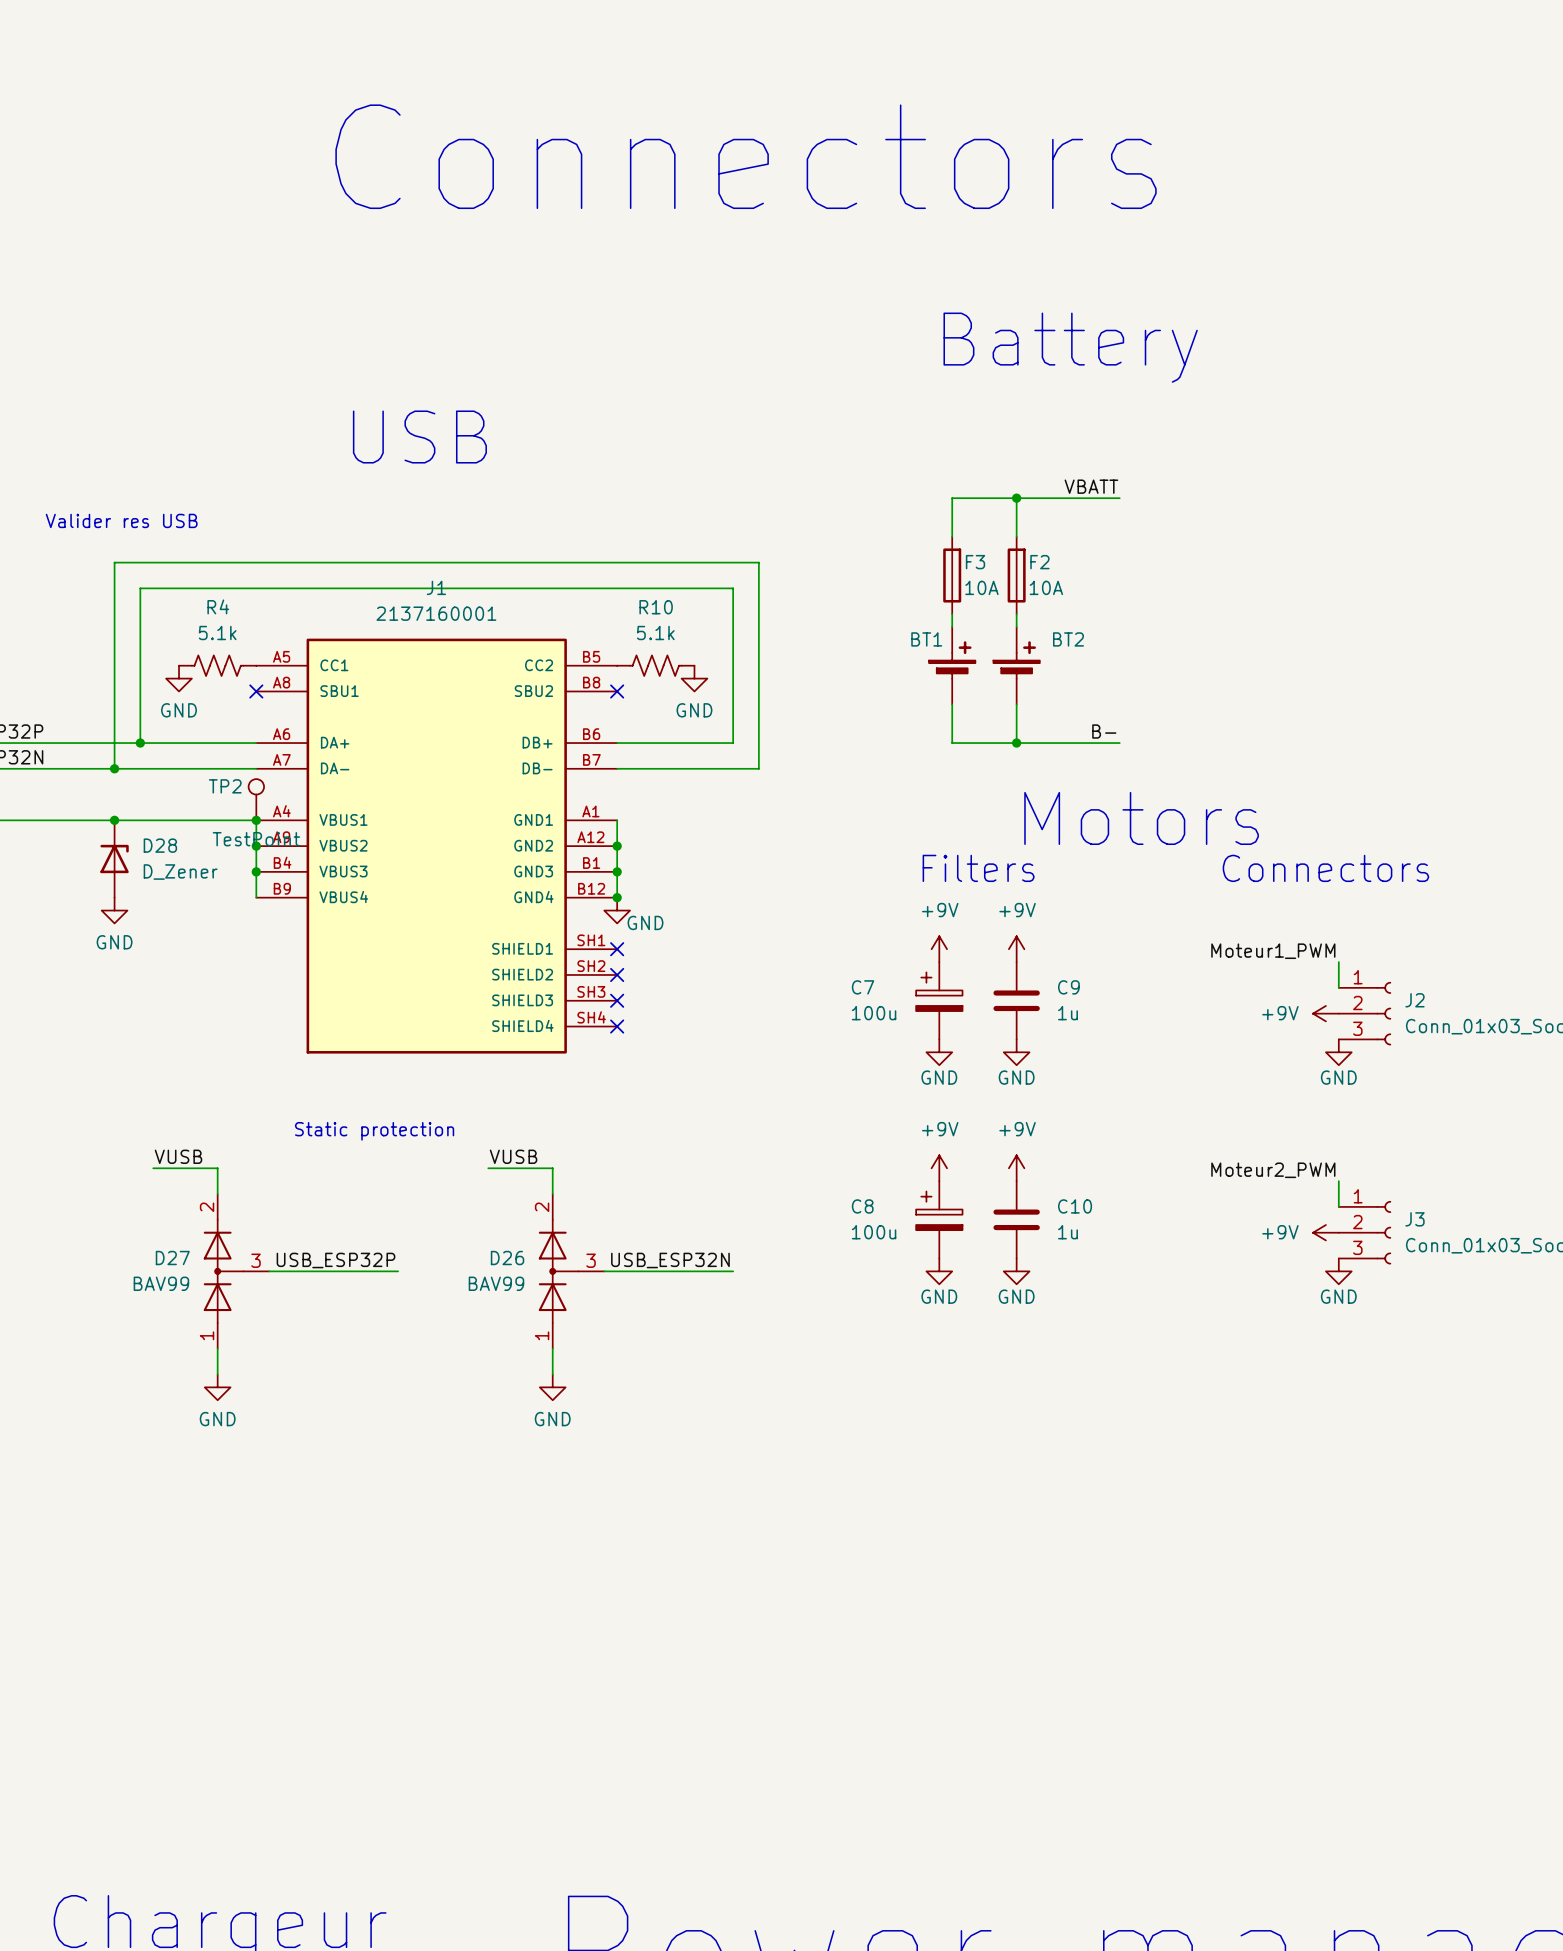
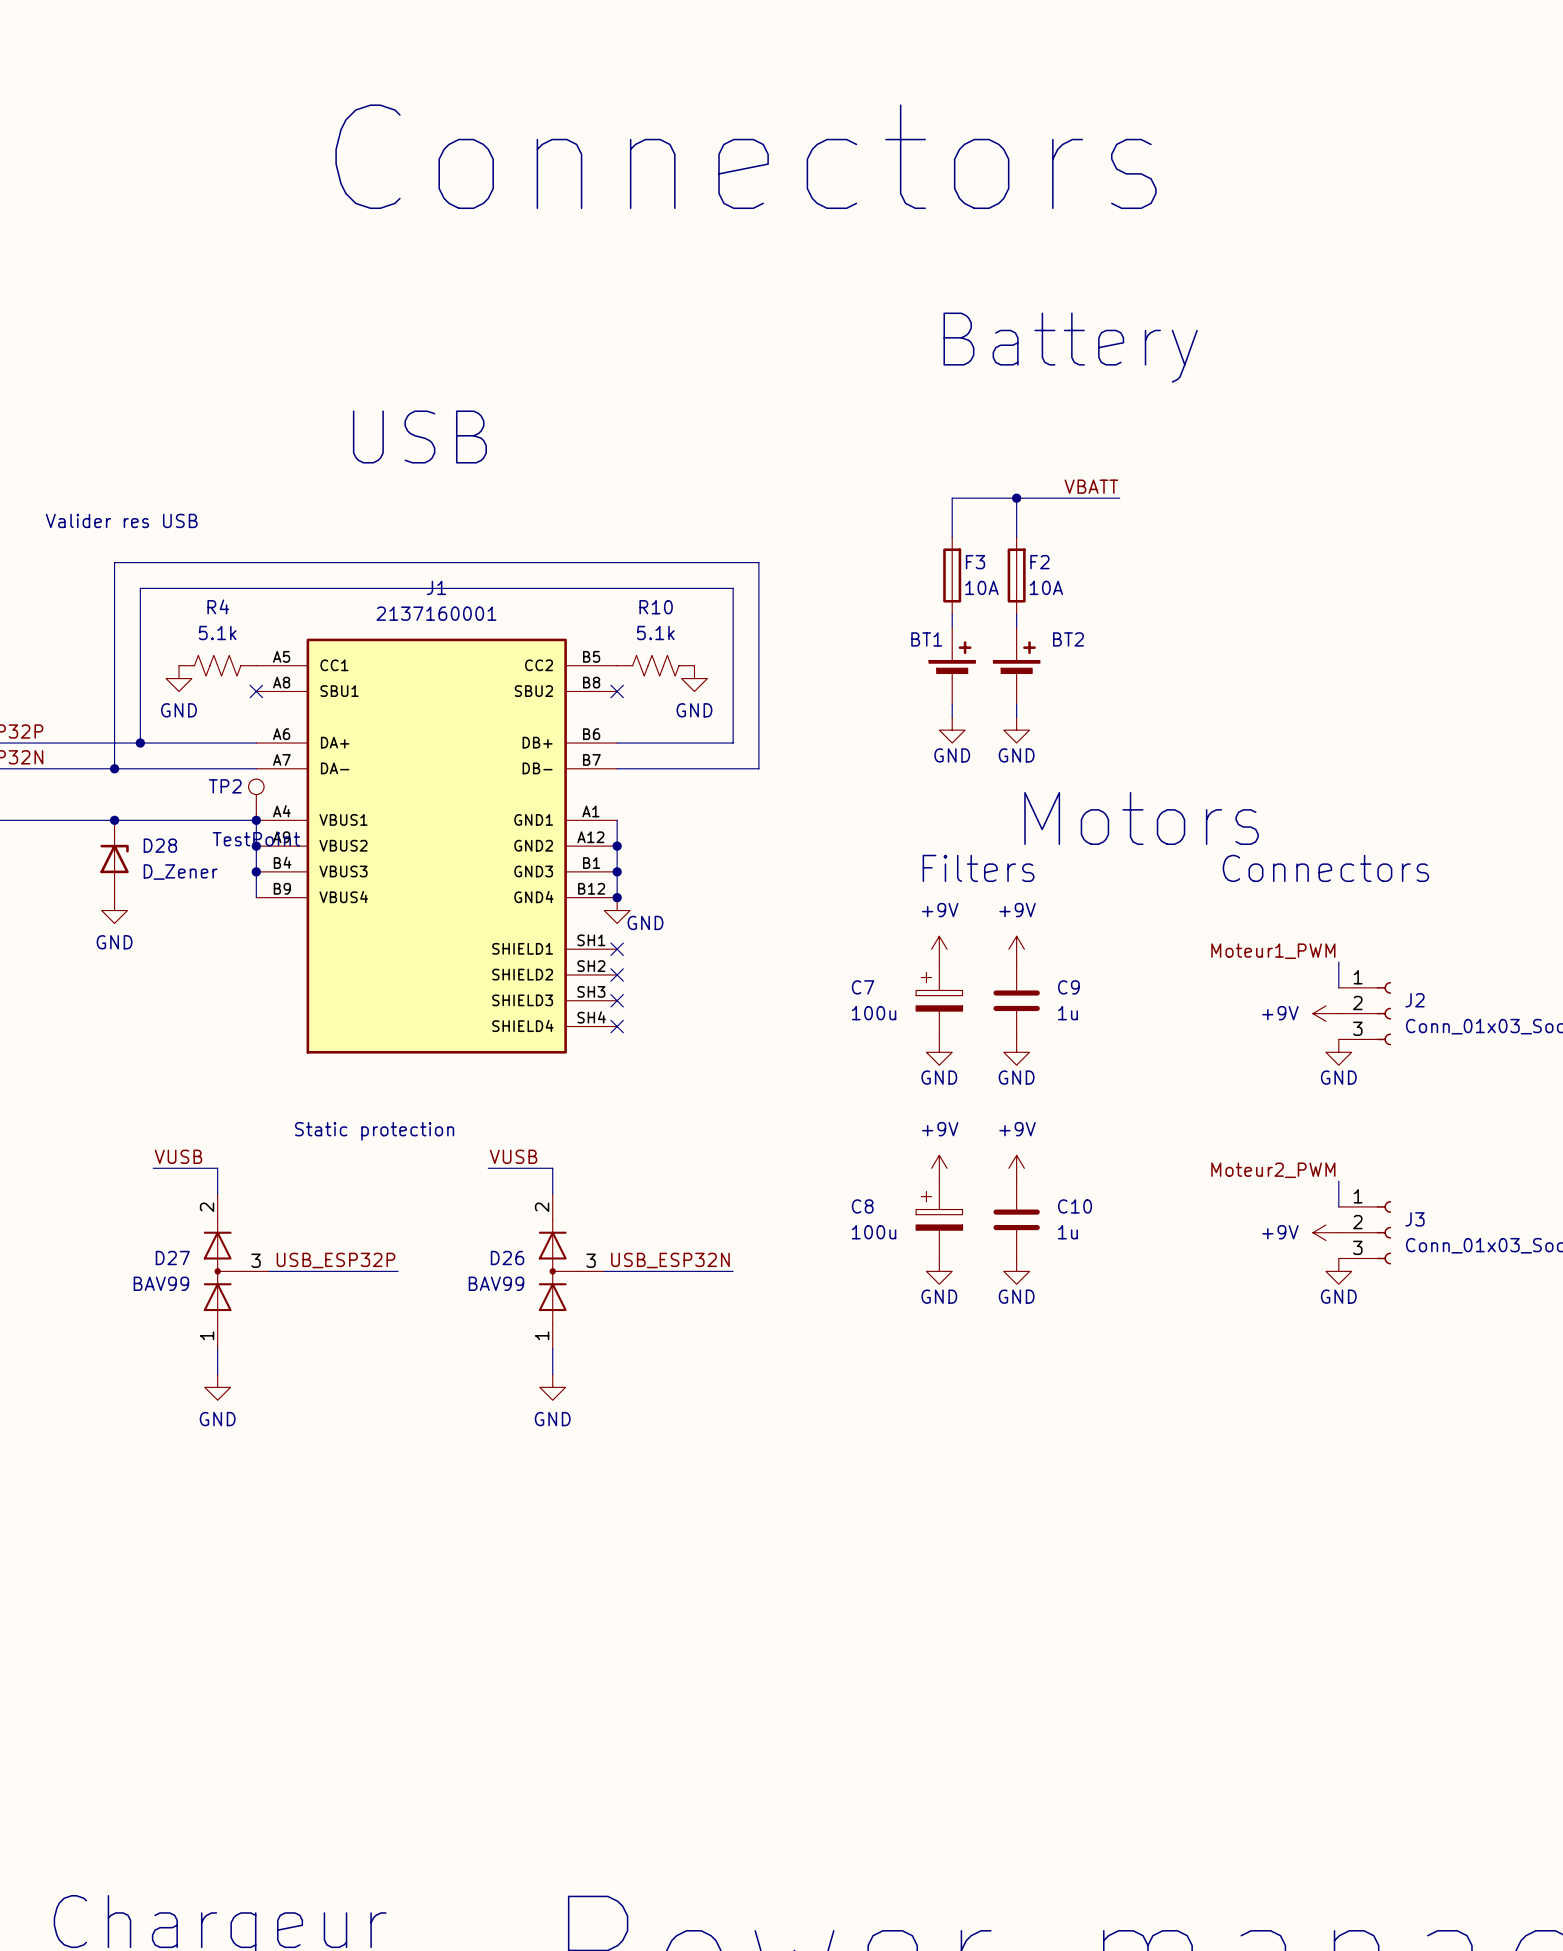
wire: (952, 717) (952, 743) (1119, 743) -> none
power symbol: none -> GND (952, 730)
power symbol: none -> GND (1016, 730)
label: B- (1104, 731) -> none
junction: (1016, 743) -> none

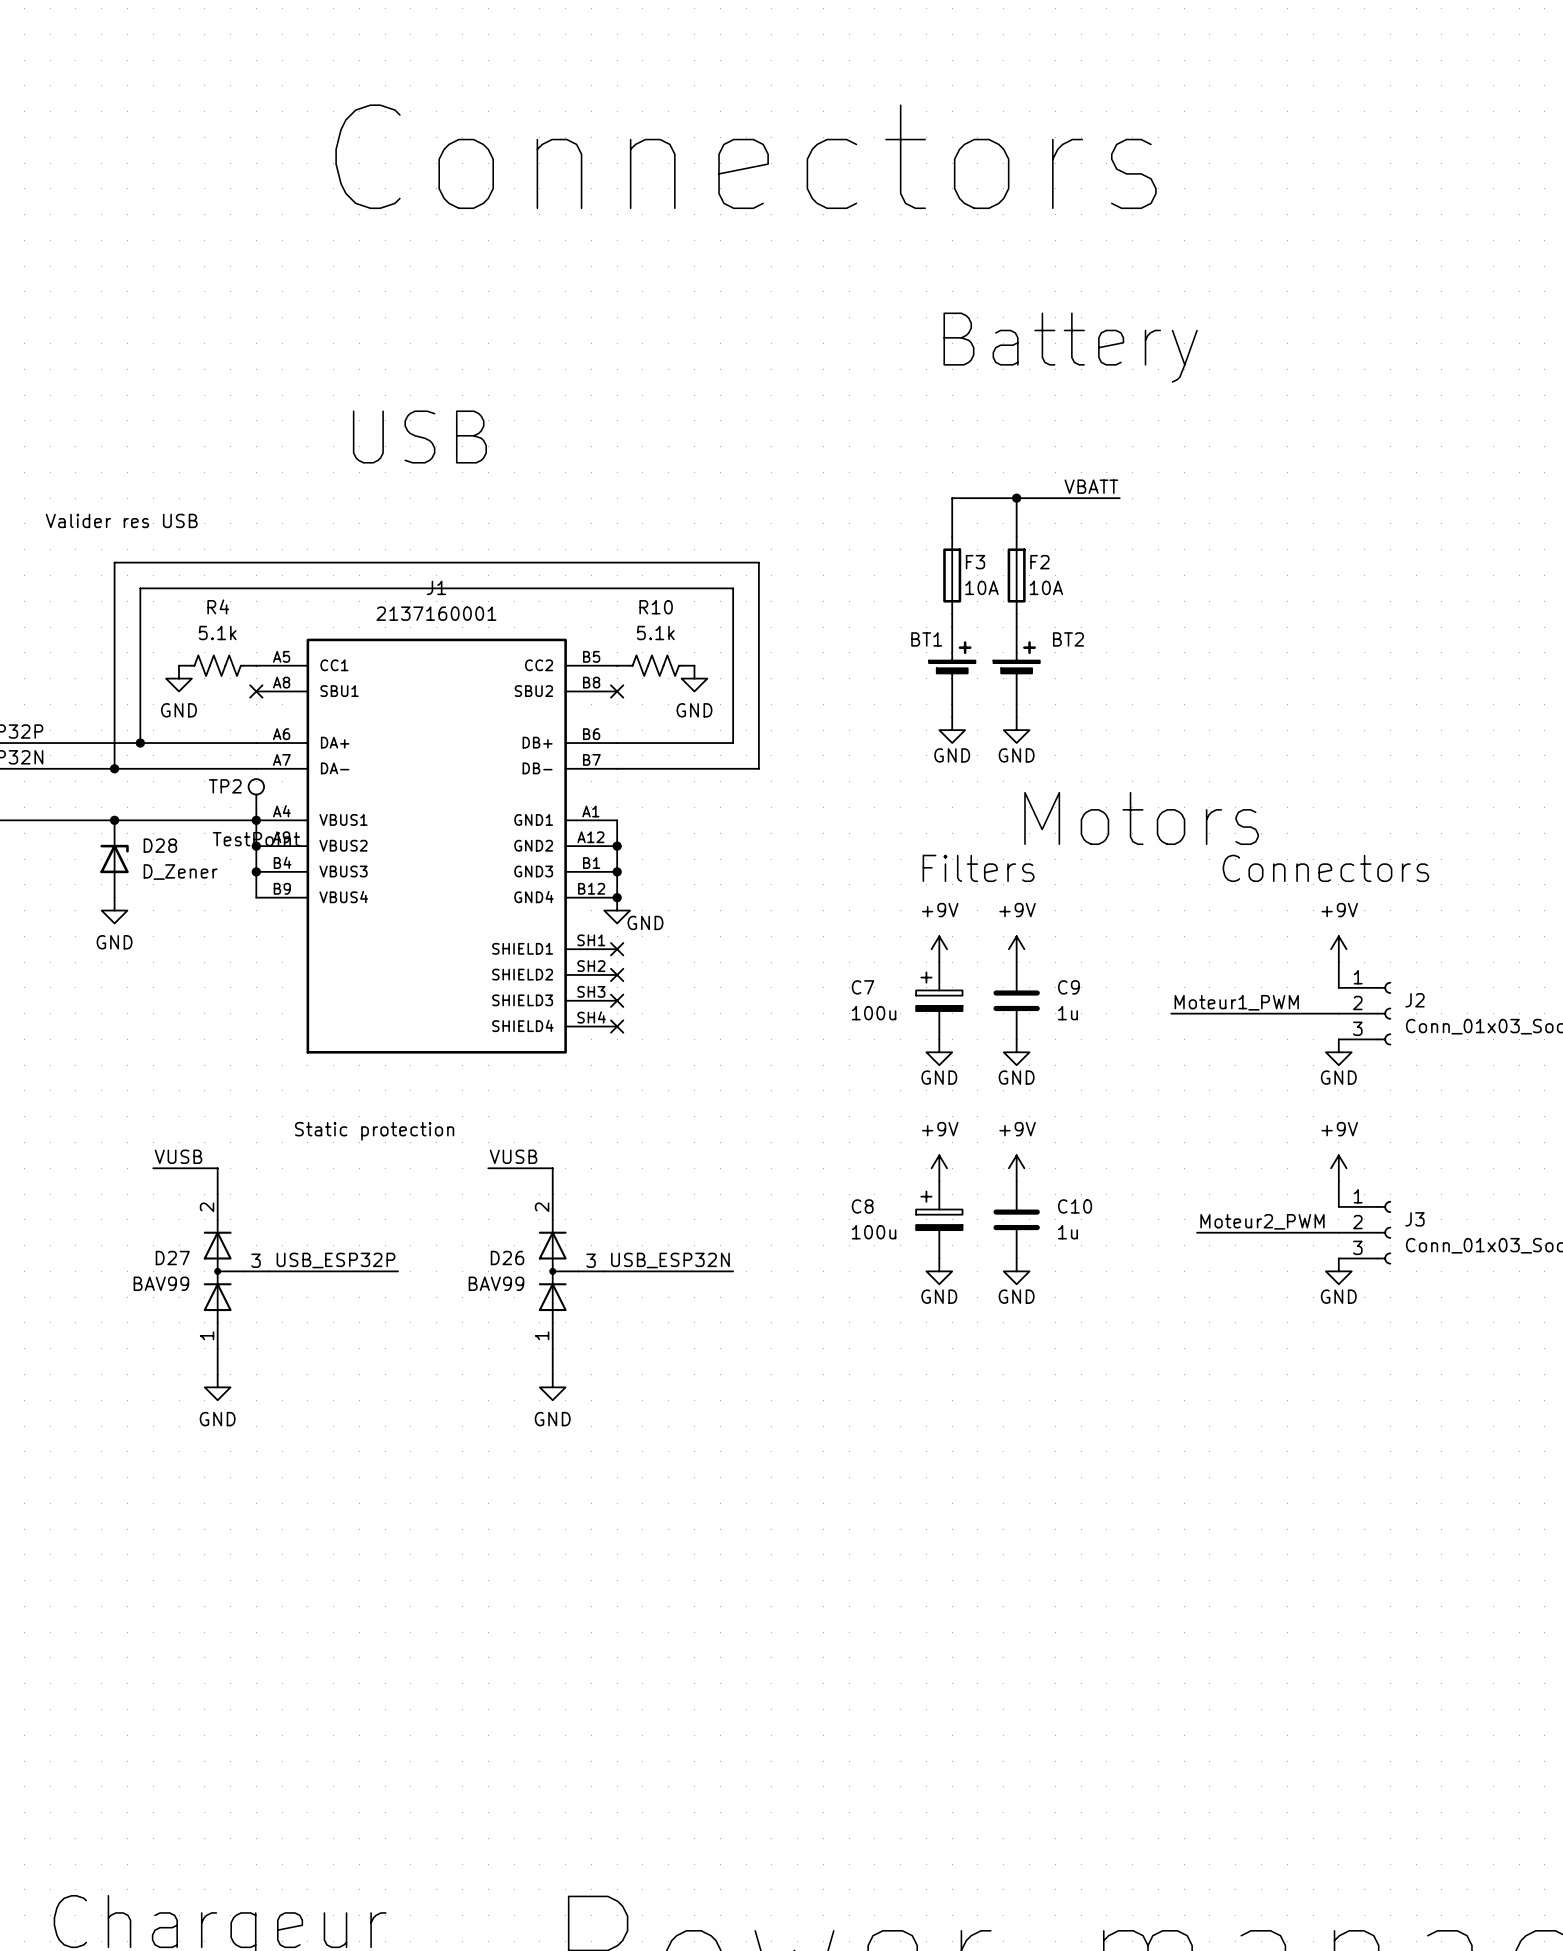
label position: Moteur1_PWM (1273, 951) -> Moteur1_PWM (1236, 1002)
wire: none -> (1171, 1013) (1338, 1013)
power symbol rotation: 0° (1325, 1013) -> 90° clockwise (1338, 949)
power symbol position: +9V (1325, 1013) -> +9V (1338, 949)
label position: Moteur2_PWM (1273, 1170) -> Moteur2_PWM (1262, 1221)
wire: none -> (1197, 1232) (1338, 1232)
power symbol rotation: 0° (1325, 1232) -> 90° clockwise (1338, 1168)
power symbol position: +9V (1325, 1232) -> +9V (1338, 1168)

